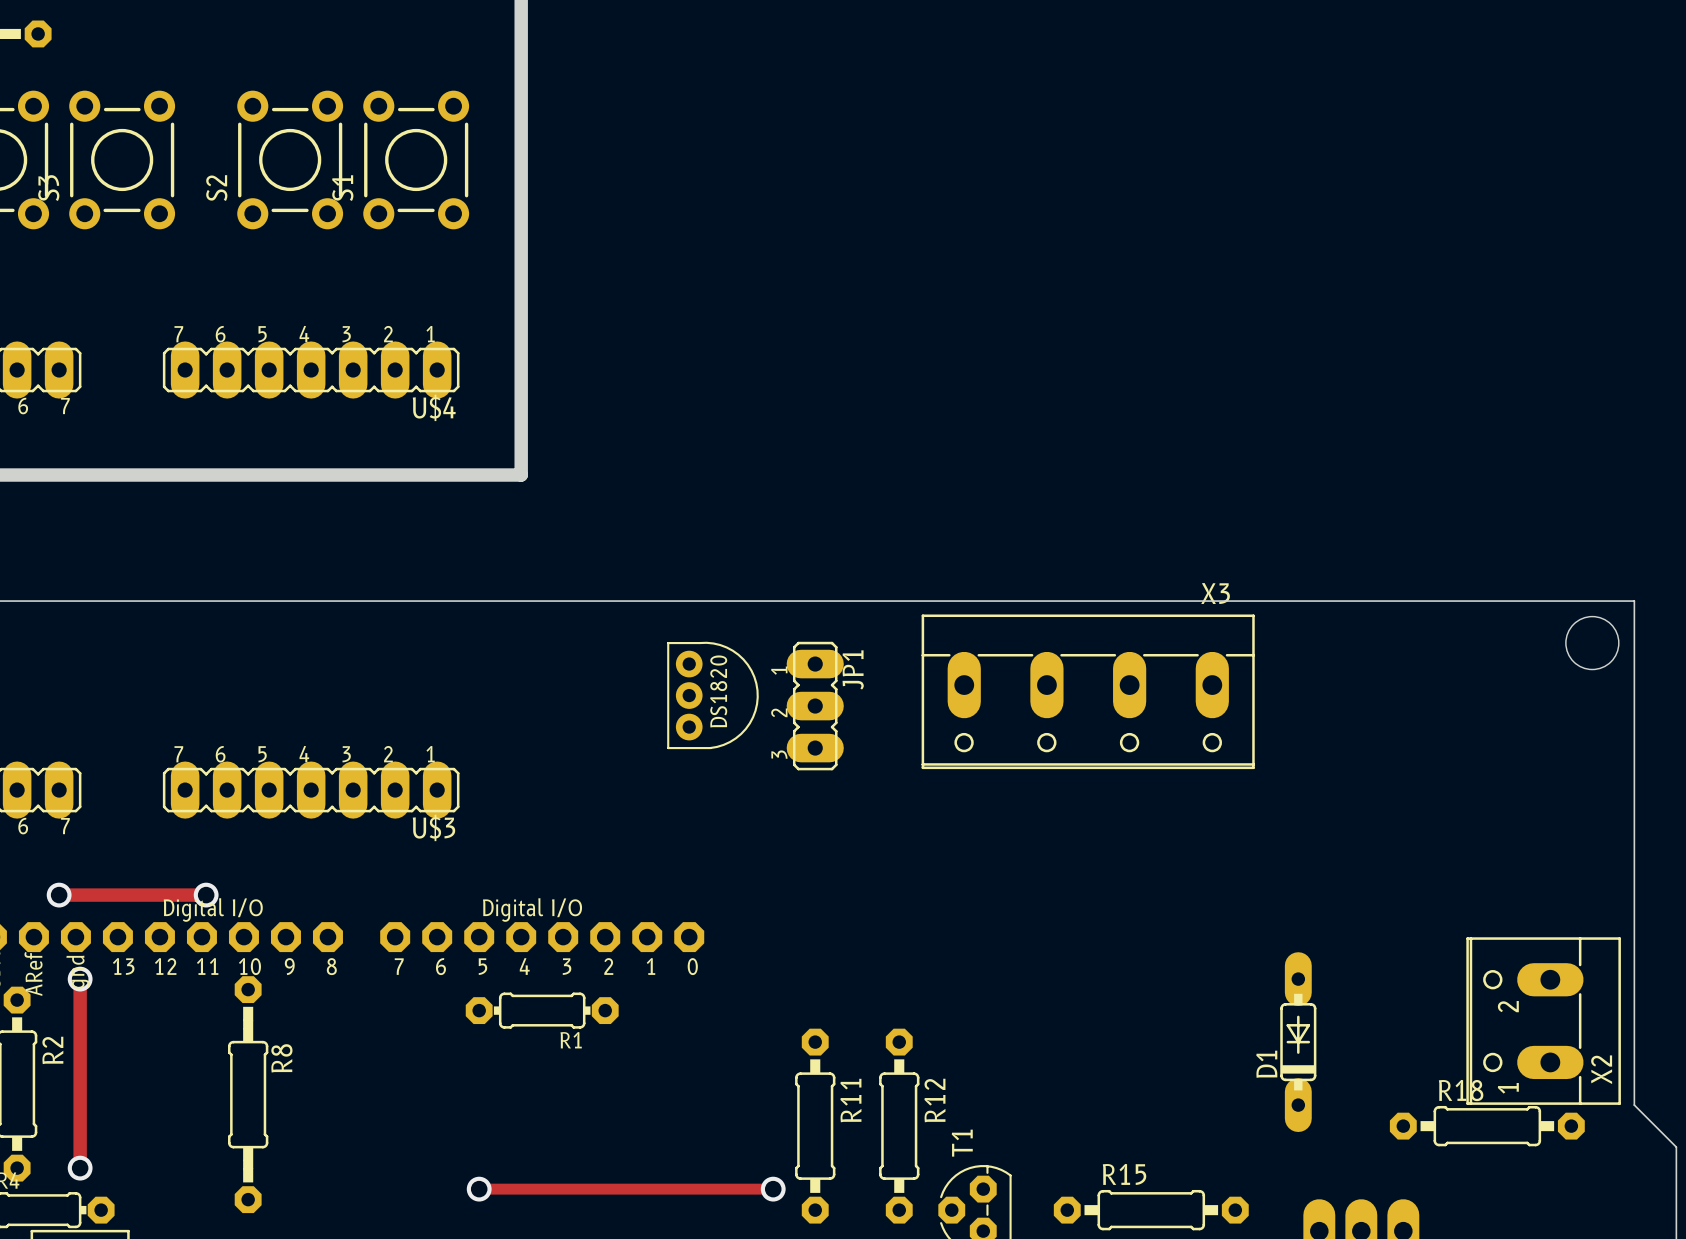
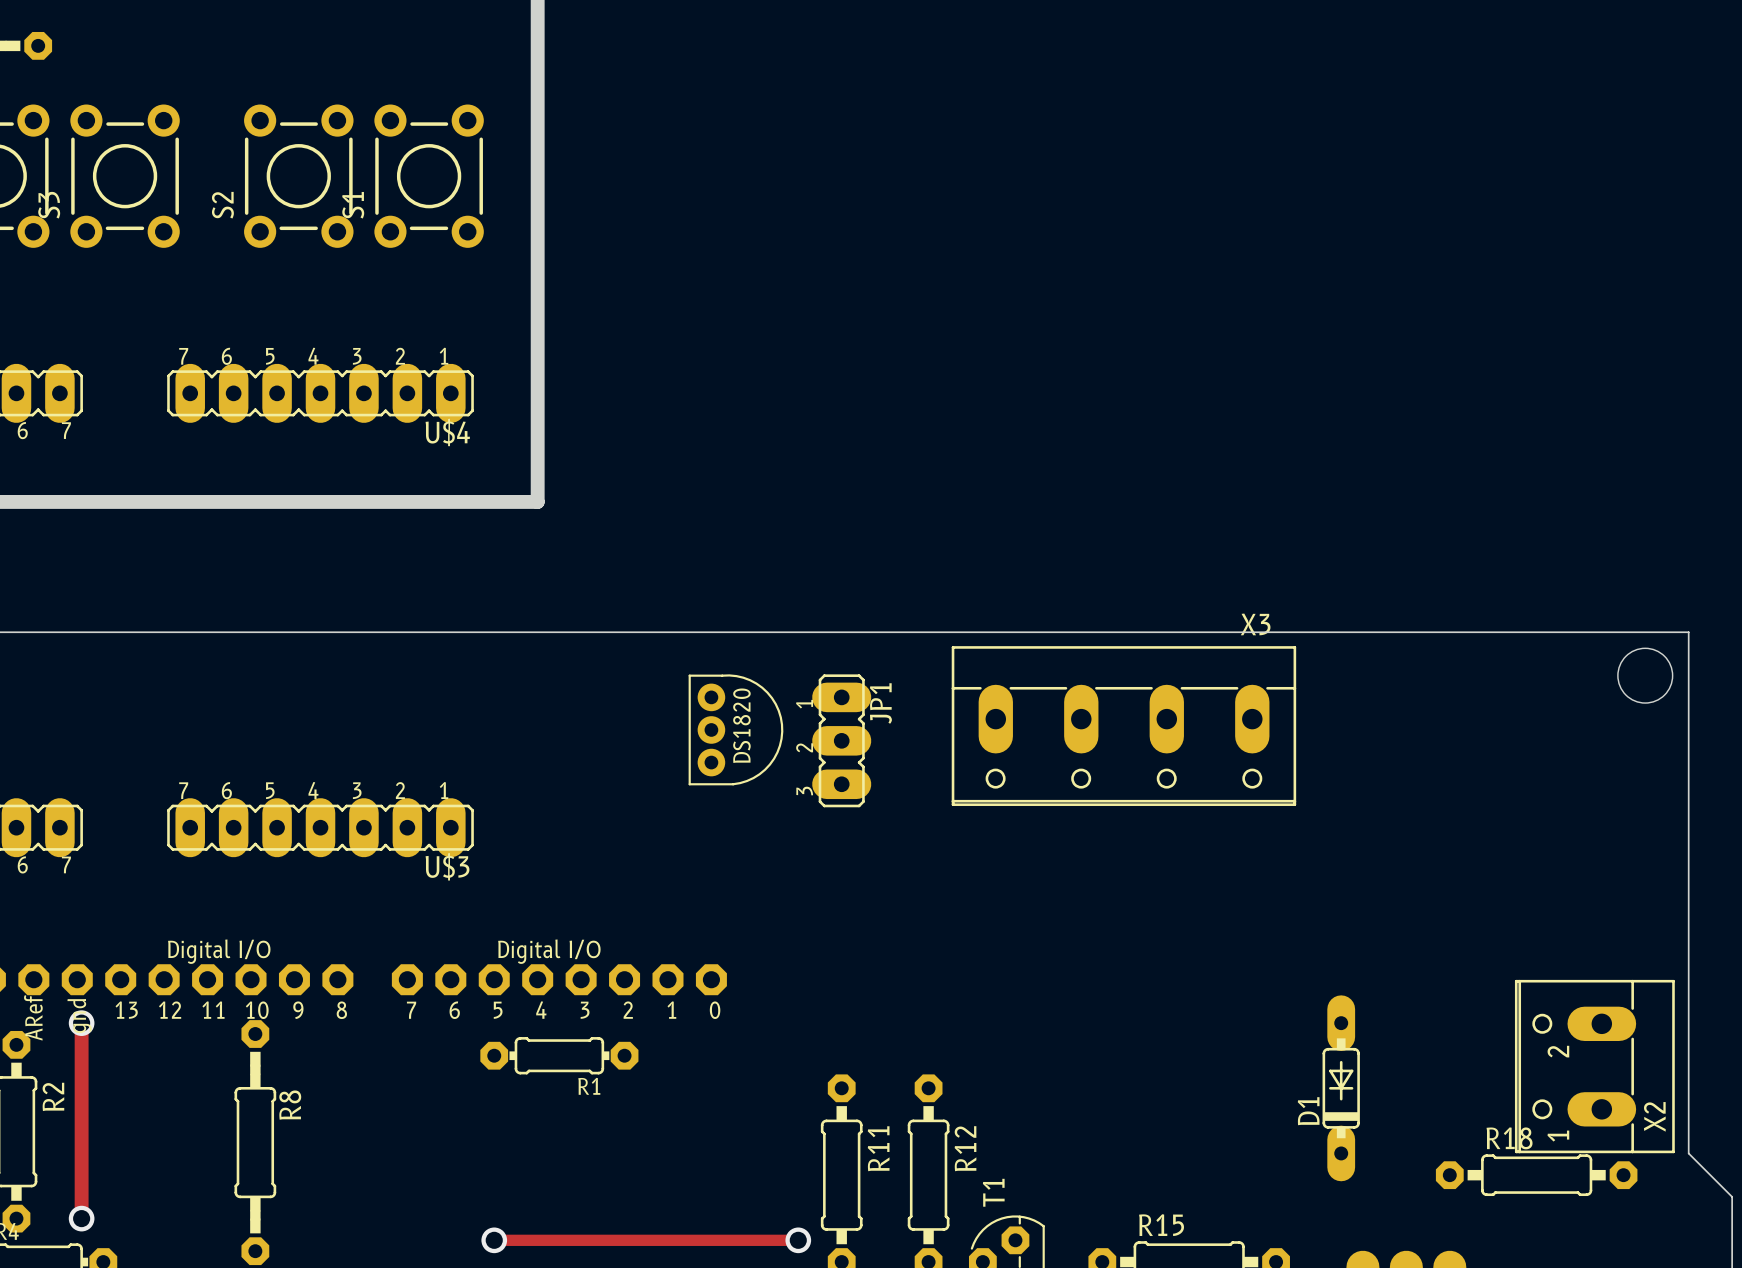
track: (59, 895) (206, 895) -> none
via: (59, 895) -> none
via: (206, 895) -> none

